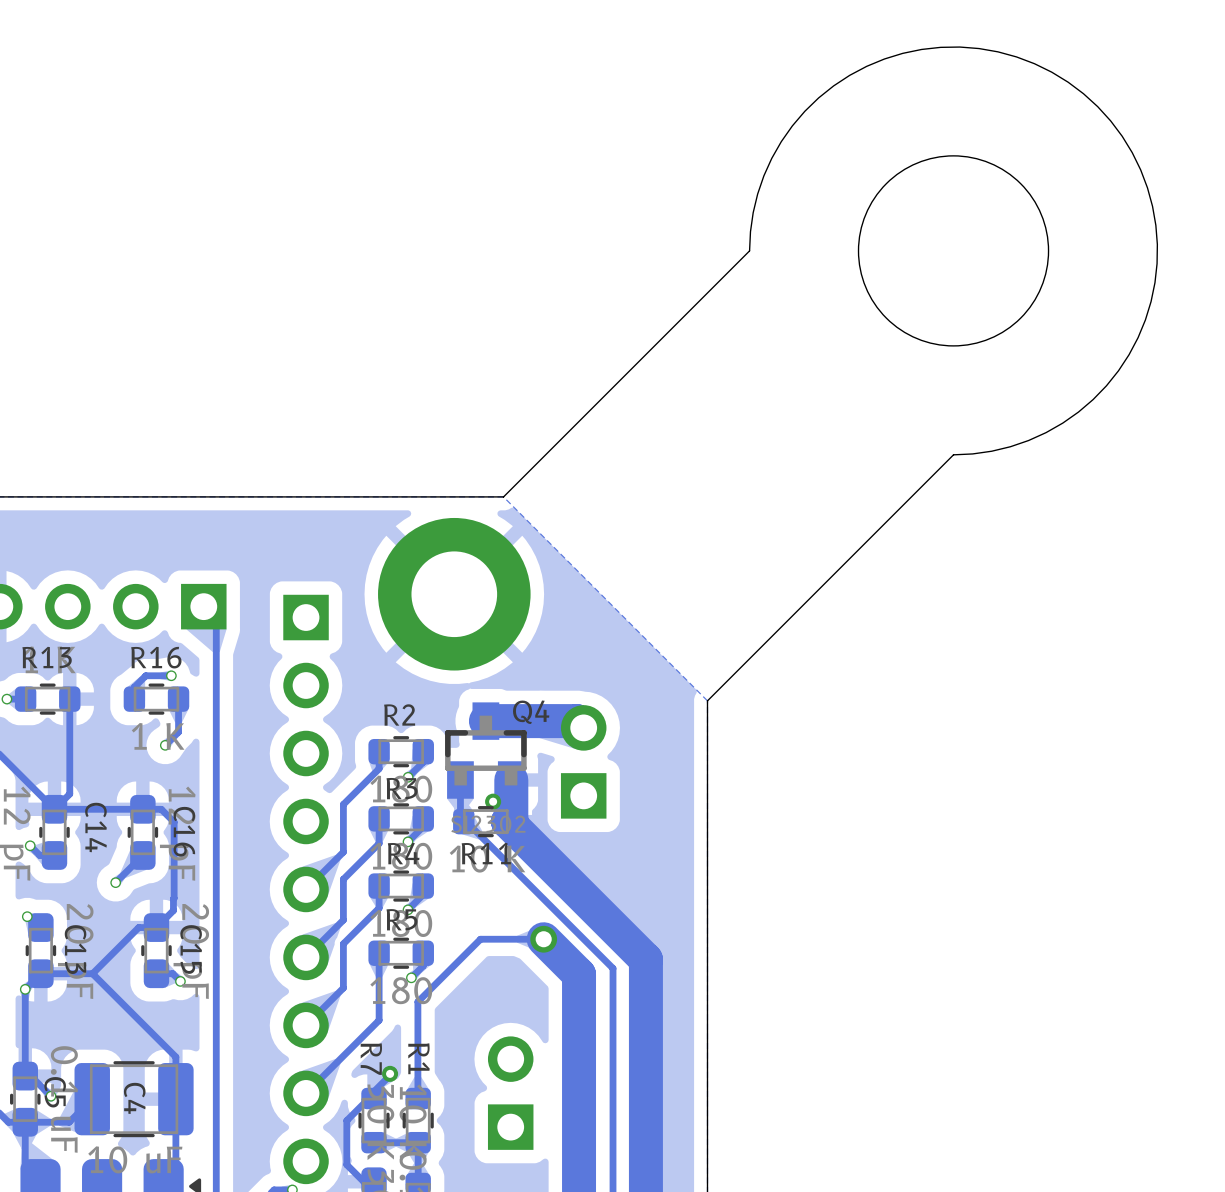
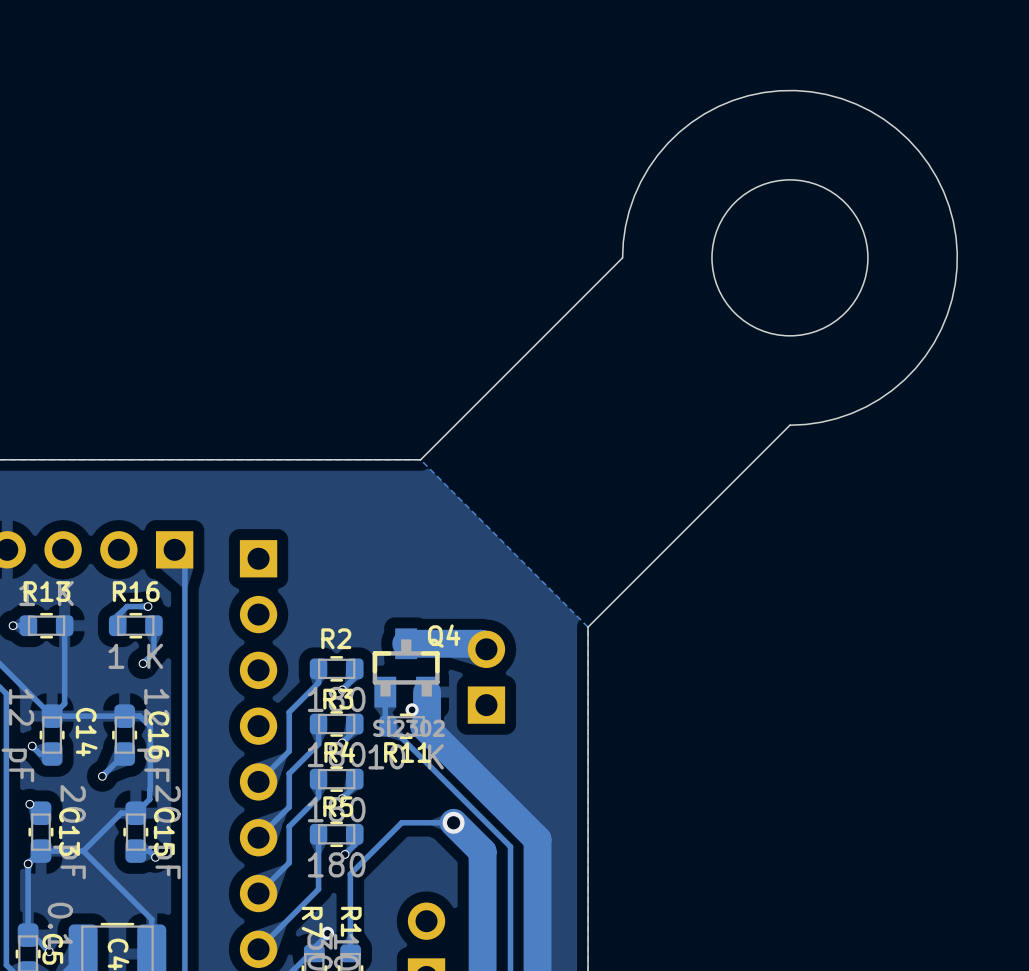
part: (454, 594) -> none

